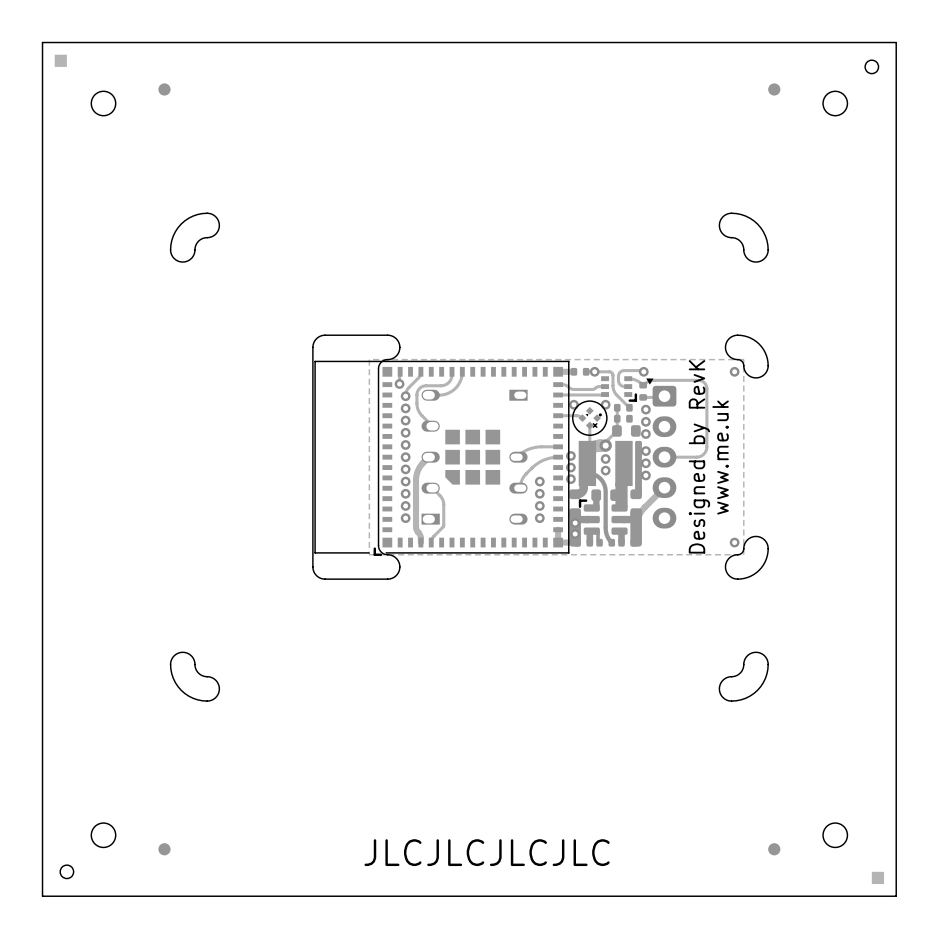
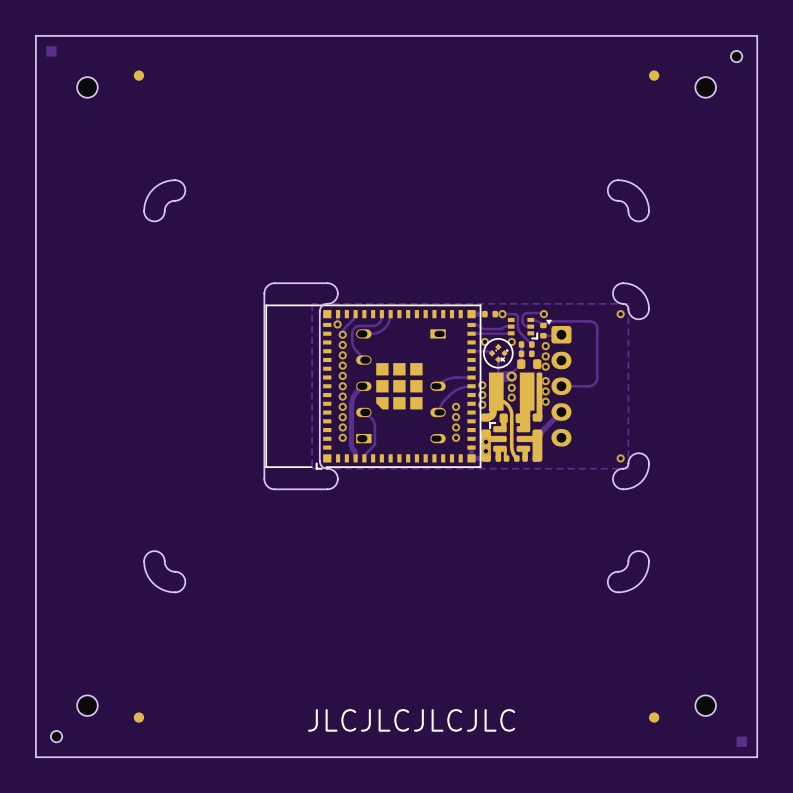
text: Designed by RevK (699, 456) -> none
text: www.me.uk (720, 457) -> none

